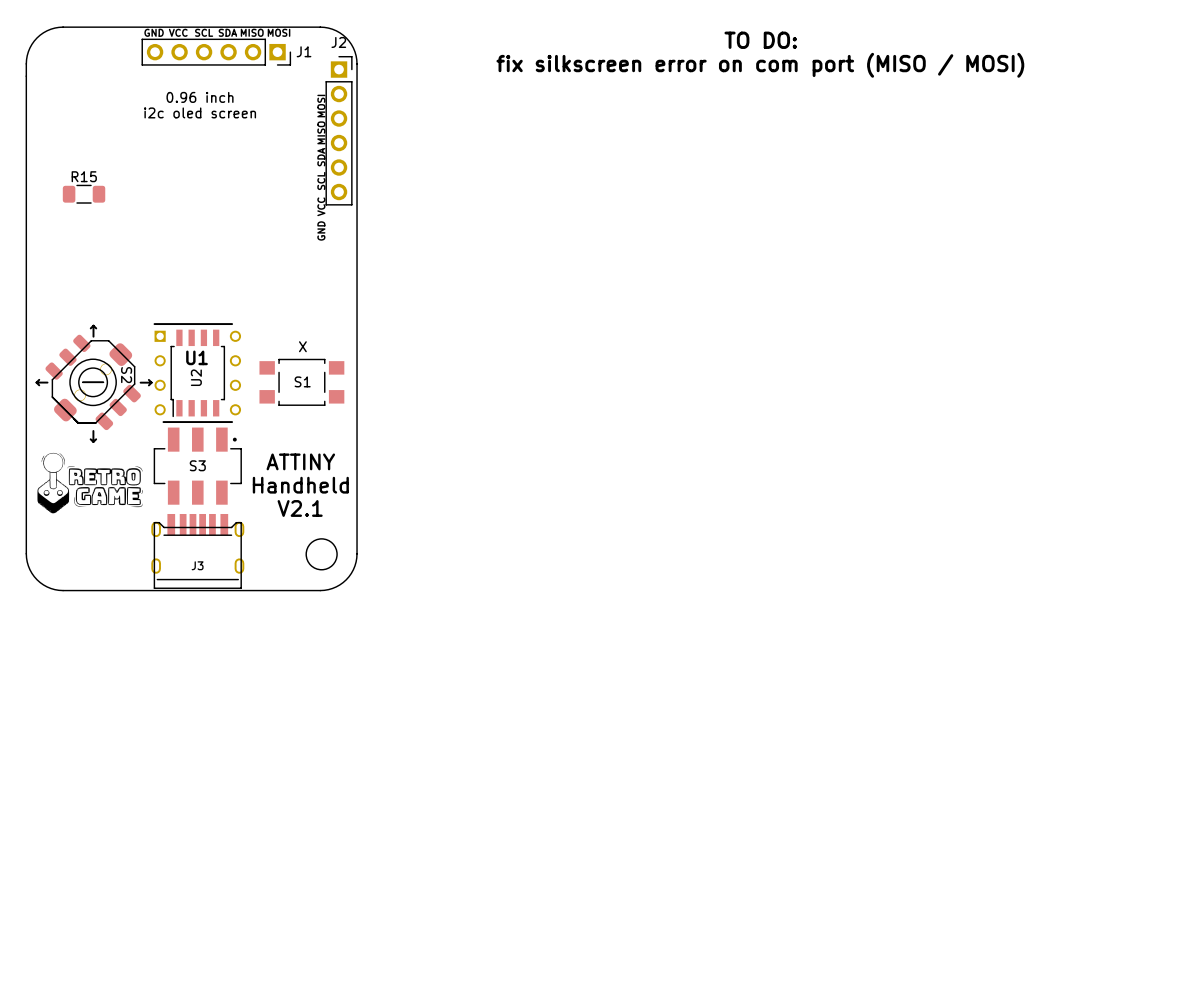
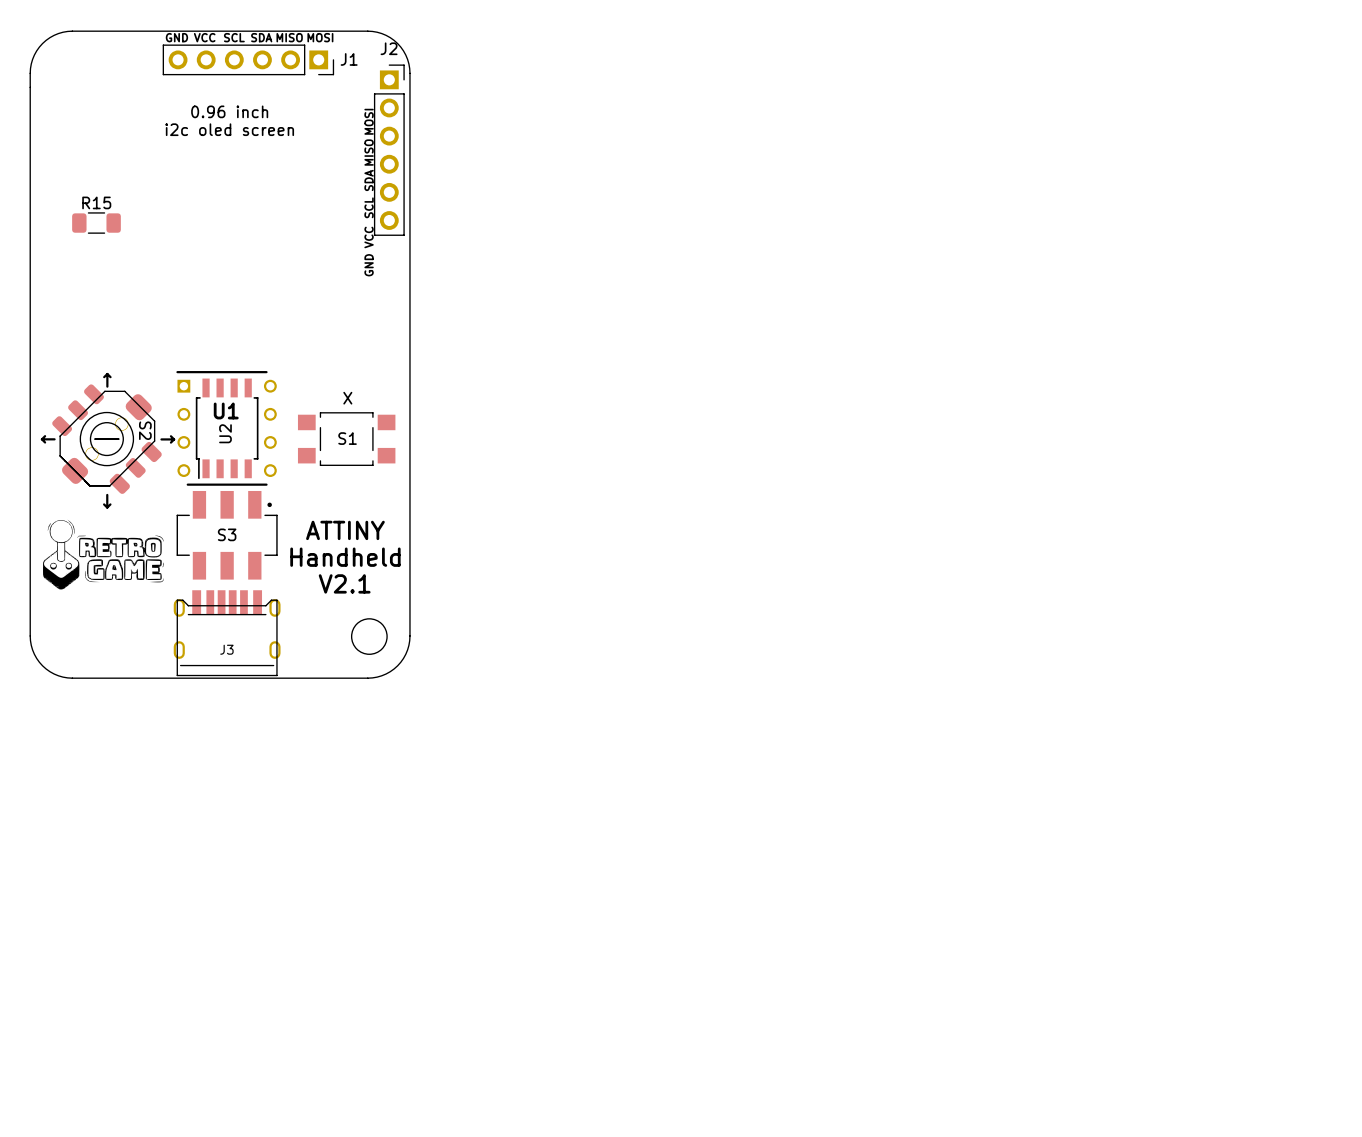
text: TO DO: (760, 40) -> none
text: fix silkscreen error on com port (MISO / MOSI) (760, 65) -> none

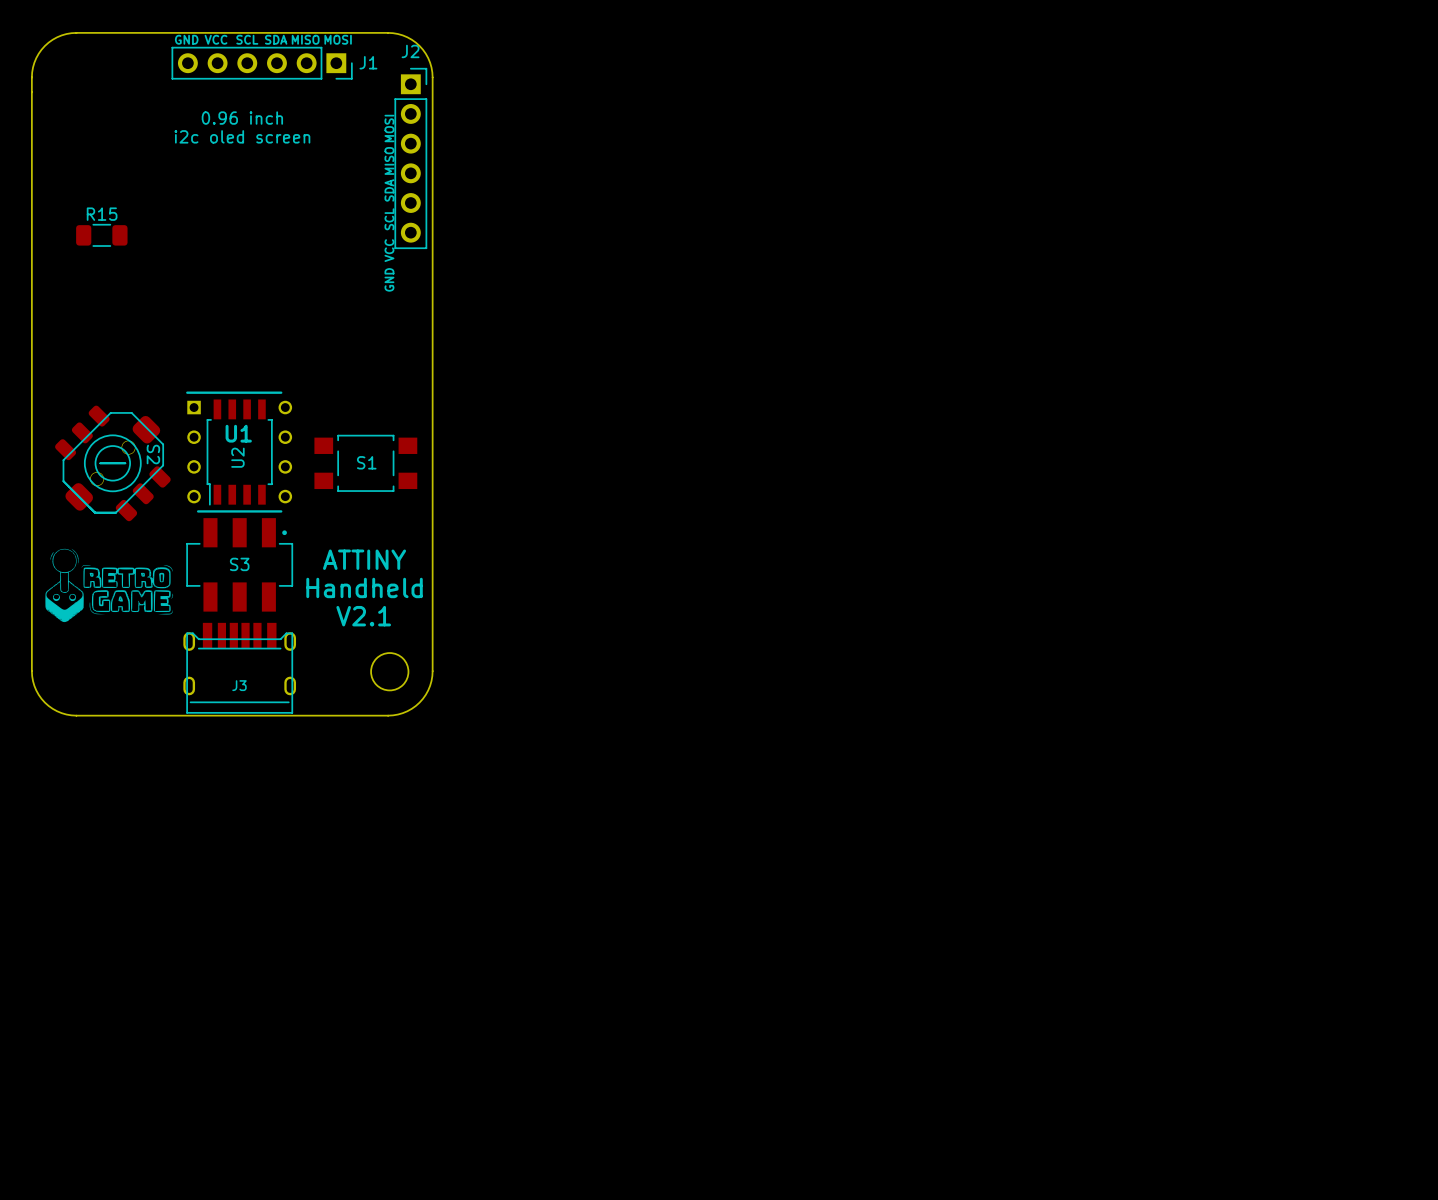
text: ← (107, 380) -> none
text: X (347, 398) -> none
text: ← (48, 439) -> none
text: ← (167, 439) -> none
text: ← (107, 501) -> none

